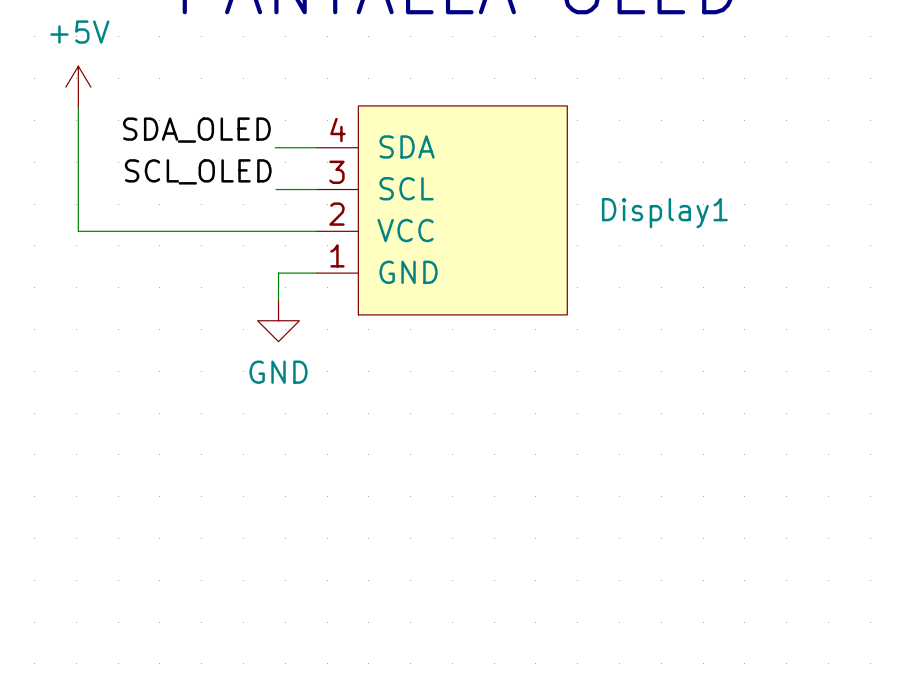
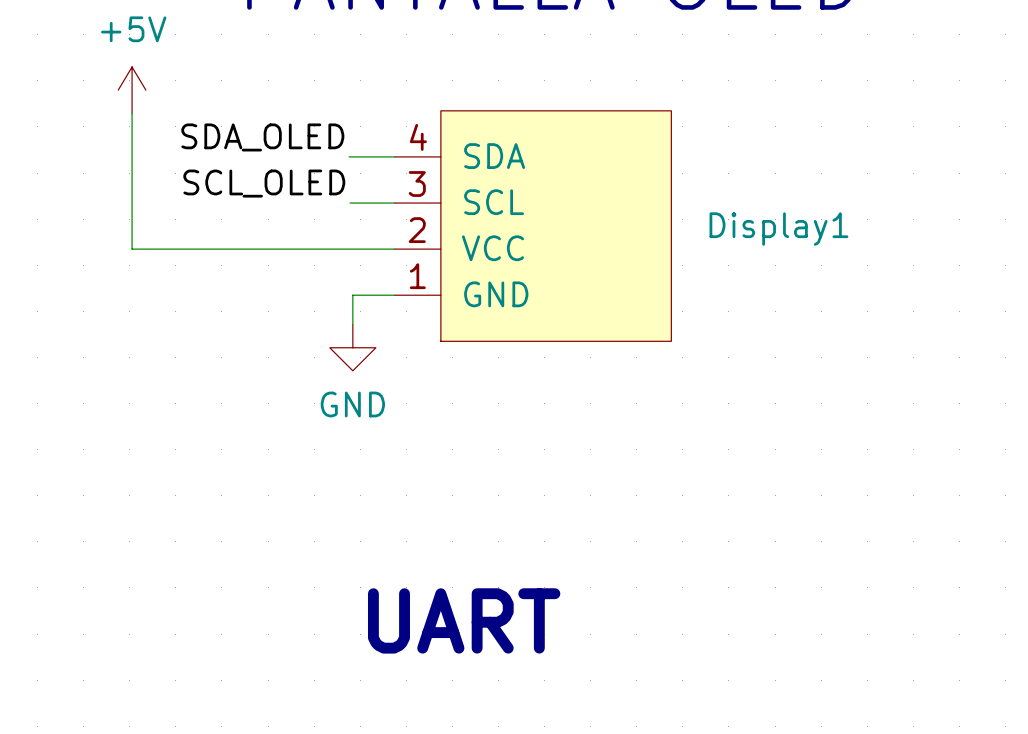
text: none -> UART (464, 620)

